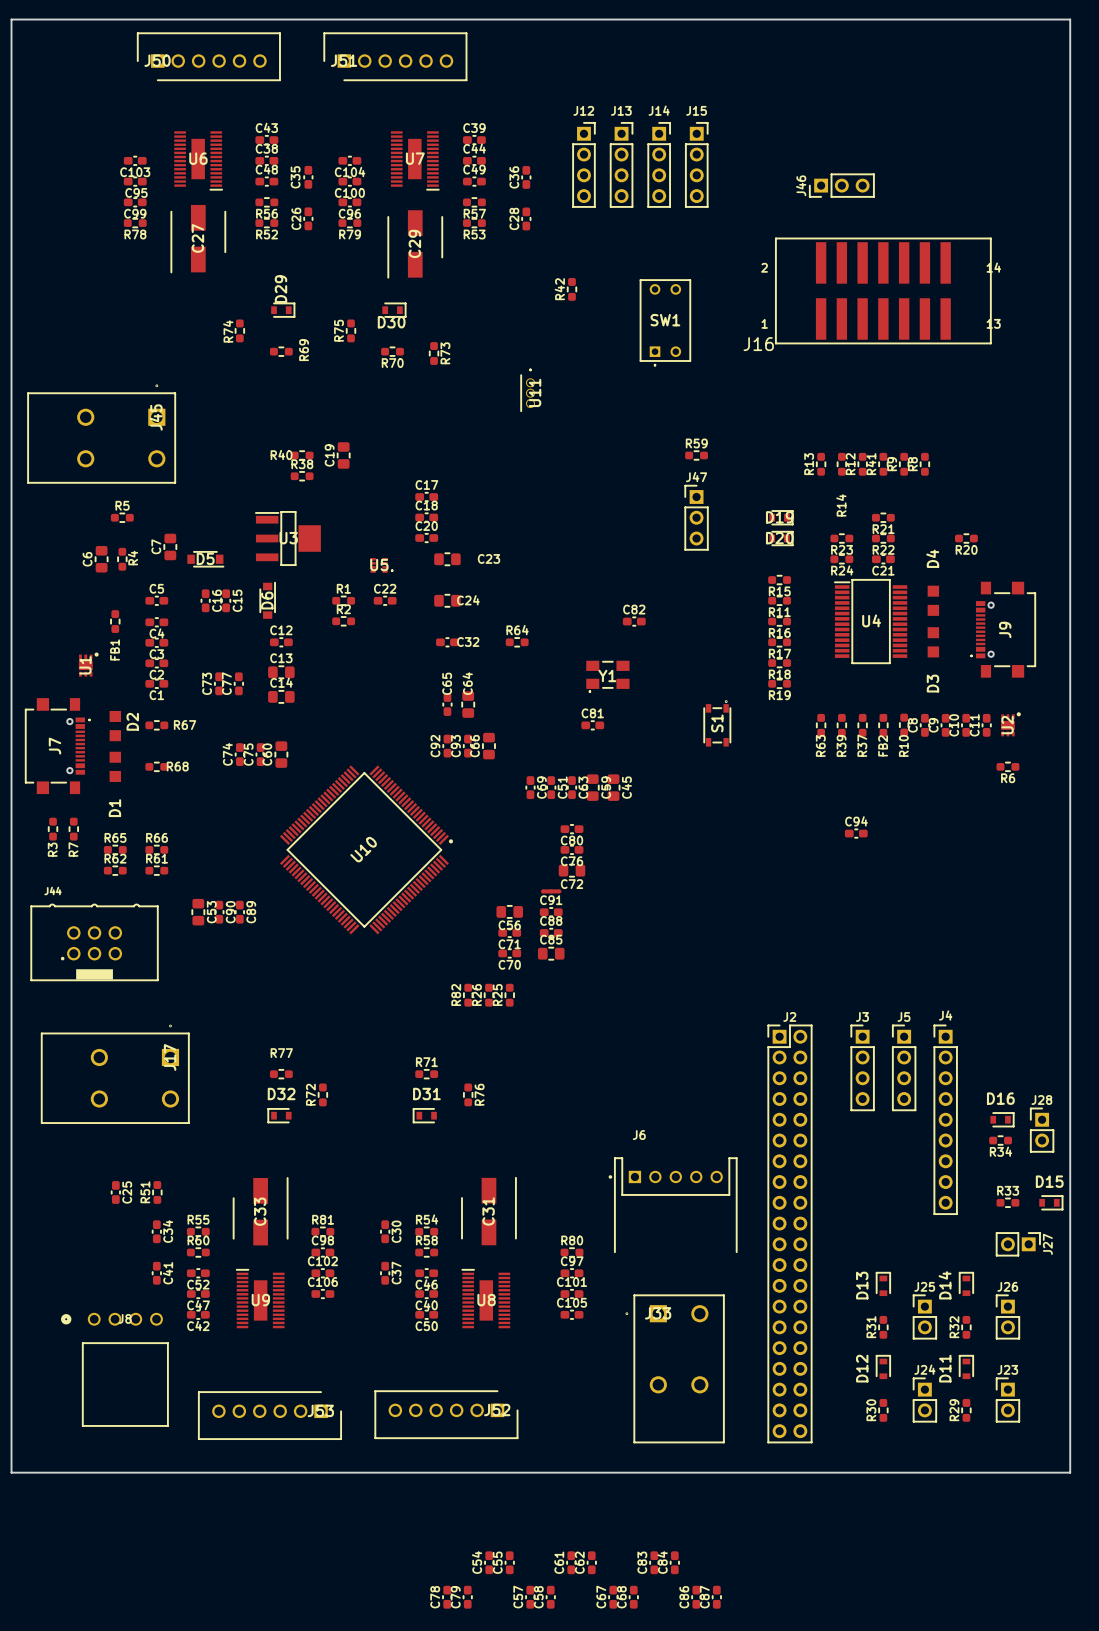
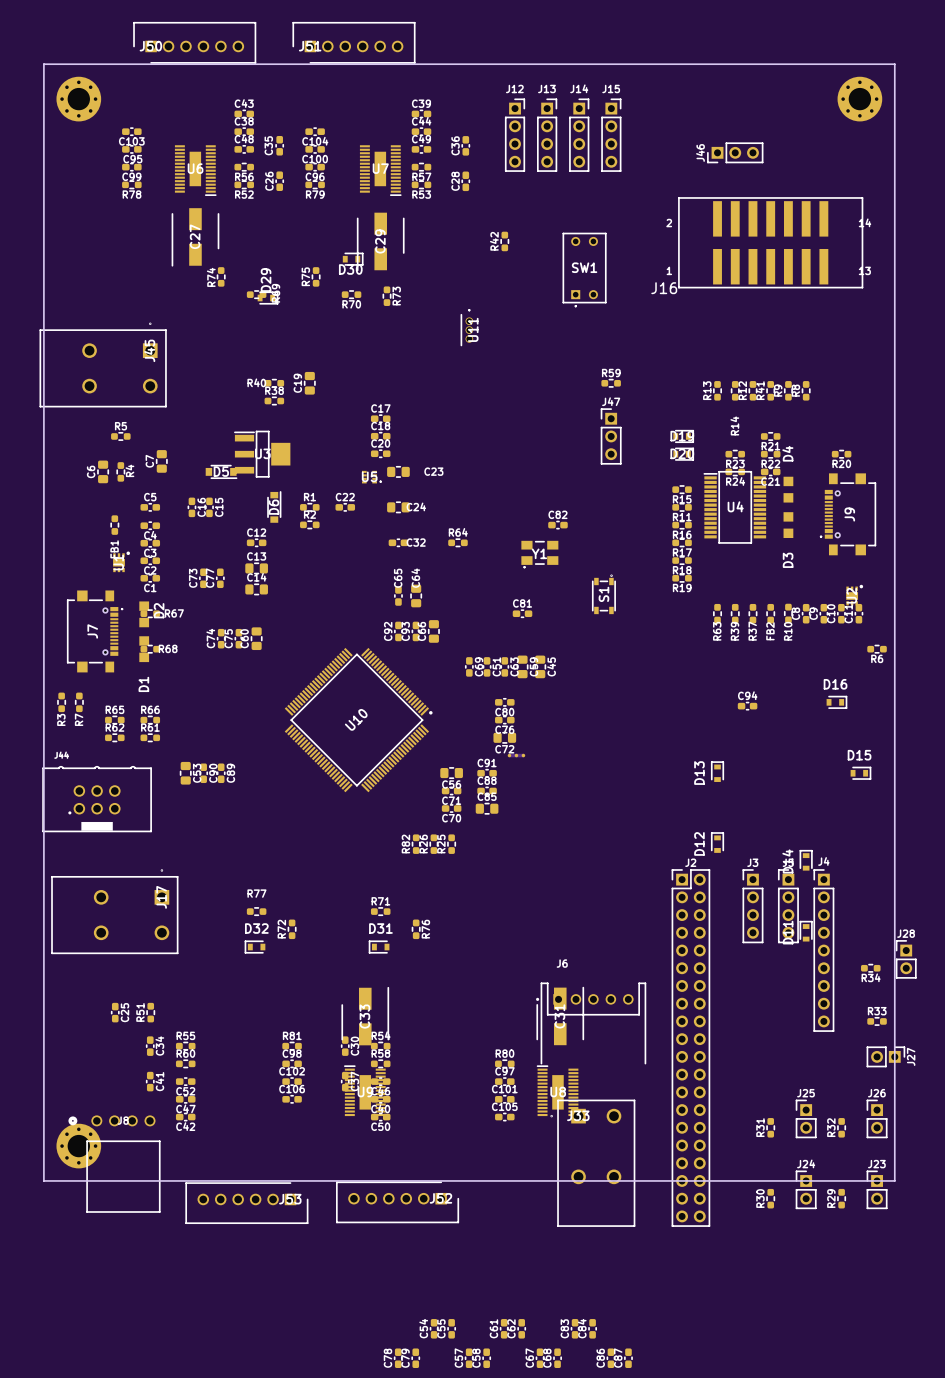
board edge: (11, 19) (1070, 19) (1070, 1472) (11, 1472) (11, 19) -> (43, 64) (43, 1180) (894, 1180) (894, 64) (43, 64)
part: none -> (78, 99)
part: none -> (859, 99)
U6 position: (198, 160) -> (195, 170)
U7 position: (415, 160) -> (380, 170)
C27 position: (198, 239) -> (195, 237)
C29 position: (415, 244) -> (380, 241)
D29 position: (283, 310) -> (267, 298)
D5 position: (205, 559) -> (221, 471)
U5 position: (381, 565) -> (371, 477)
D6 position: (267, 600) -> (274, 507)
D4 position: (933, 600) -> (788, 489)
U4 position: (870, 621) -> (734, 507)
J9 position: (1003, 629) -> (848, 514)
D3 position: (933, 642) -> (788, 525)
U1 position: (88, 664) -> (121, 561)
Y1 position: (607, 676) -> (539, 554)
S1 position: (717, 723) -> (603, 594)
U2 position: (1010, 724) -> (854, 595)
D2 position: (115, 726) -> (144, 614)
J7 position: (57, 746) -> (94, 631)
D1 position: (115, 766) -> (144, 649)
U10 position: (366, 849) -> (358, 720)
part position: (551, 891) -> (516, 755)
D16 position: (1002, 1119) -> (836, 702)
D15 position: (1051, 1202) -> (860, 773)
C33 position: (260, 1211) -> (365, 1016)
C31 position: (488, 1211) -> (560, 1016)
D13 position: (883, 1284) -> (717, 771)
D14 position: (966, 1284) -> (806, 860)
U9 position: (260, 1298) -> (364, 1090)
U8 position: (485, 1298) -> (557, 1090)
part: none -> (78, 1146)
D12 position: (883, 1367) -> (717, 842)
D11 position: (966, 1367) -> (806, 931)

